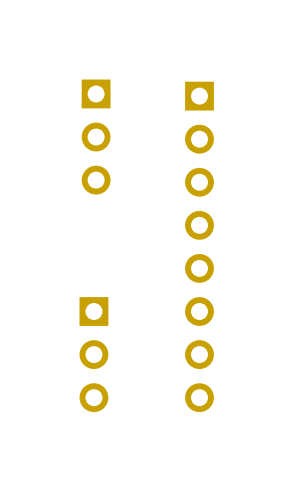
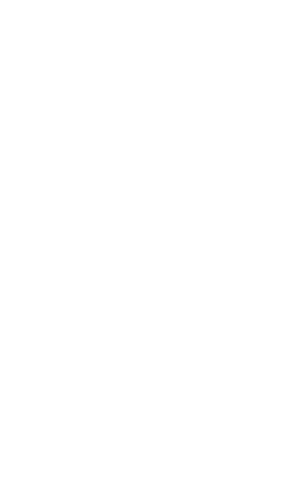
part: (96, 137) -> none
part: (199, 246) -> none
part: (93, 354) -> none

